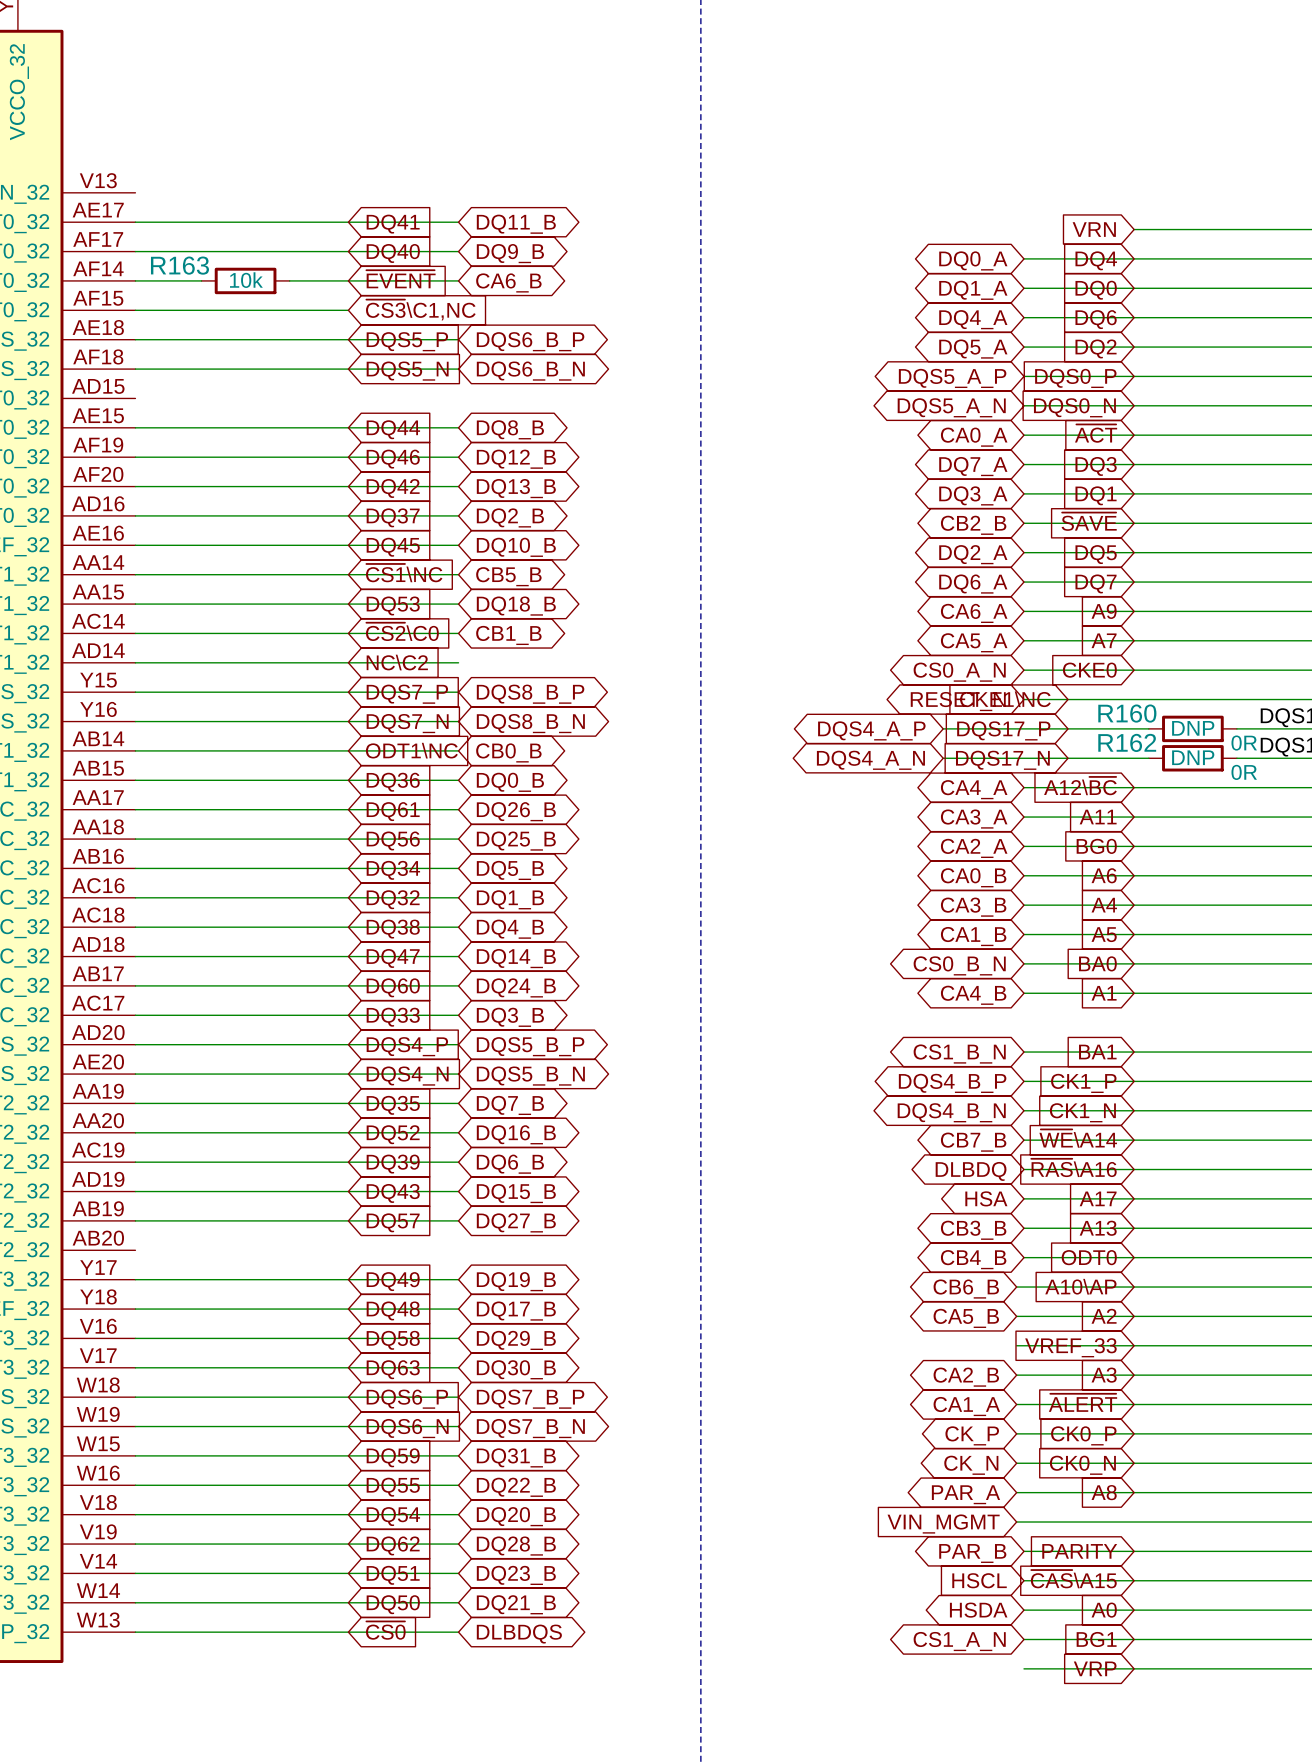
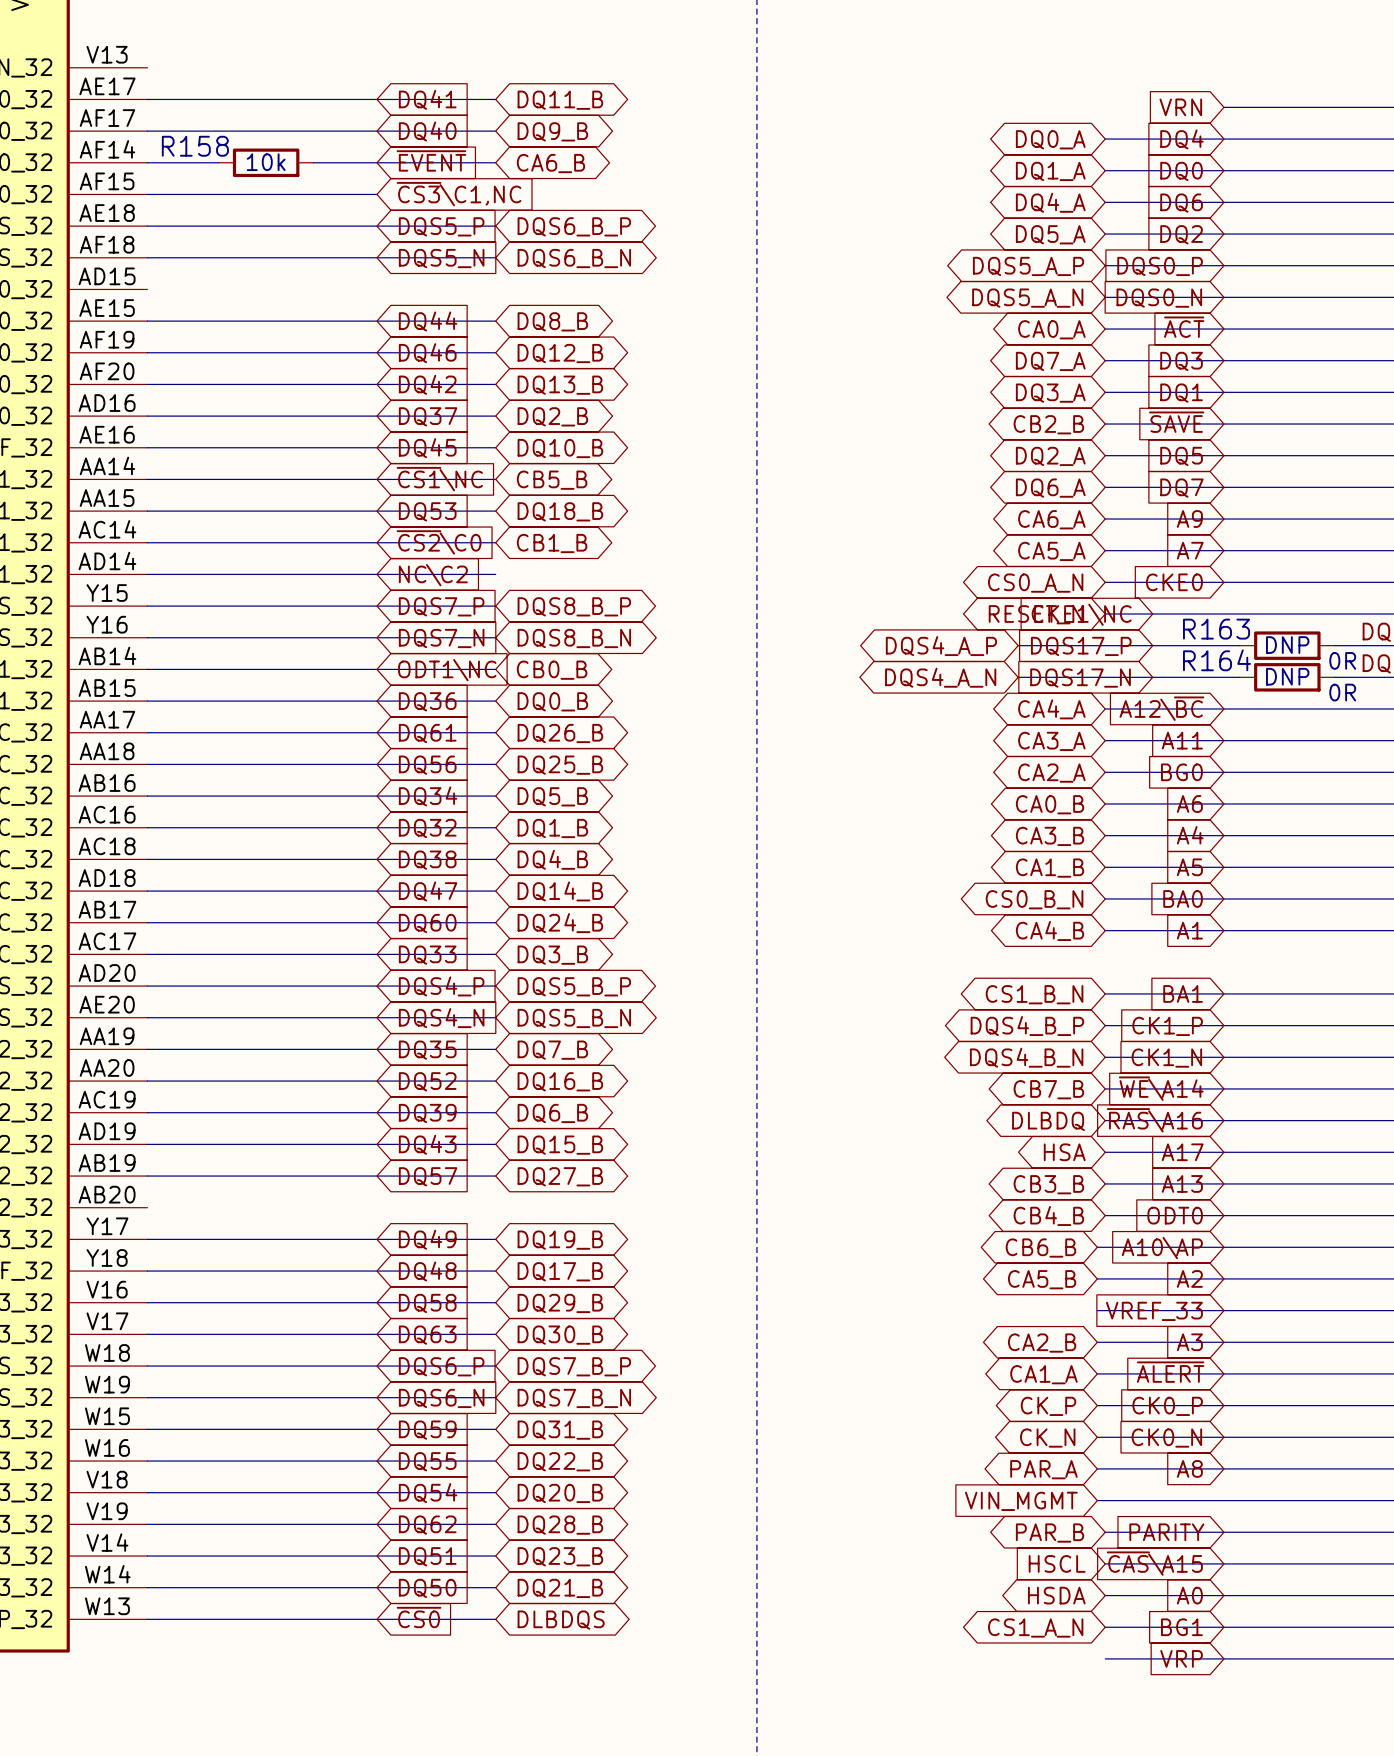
R163 name: R163 (179, 265) -> R158 (195, 146)
R160 name: R160 (1127, 713) -> R163 (1216, 629)
R162 name: R162 (1127, 742) -> R164 (1216, 660)

